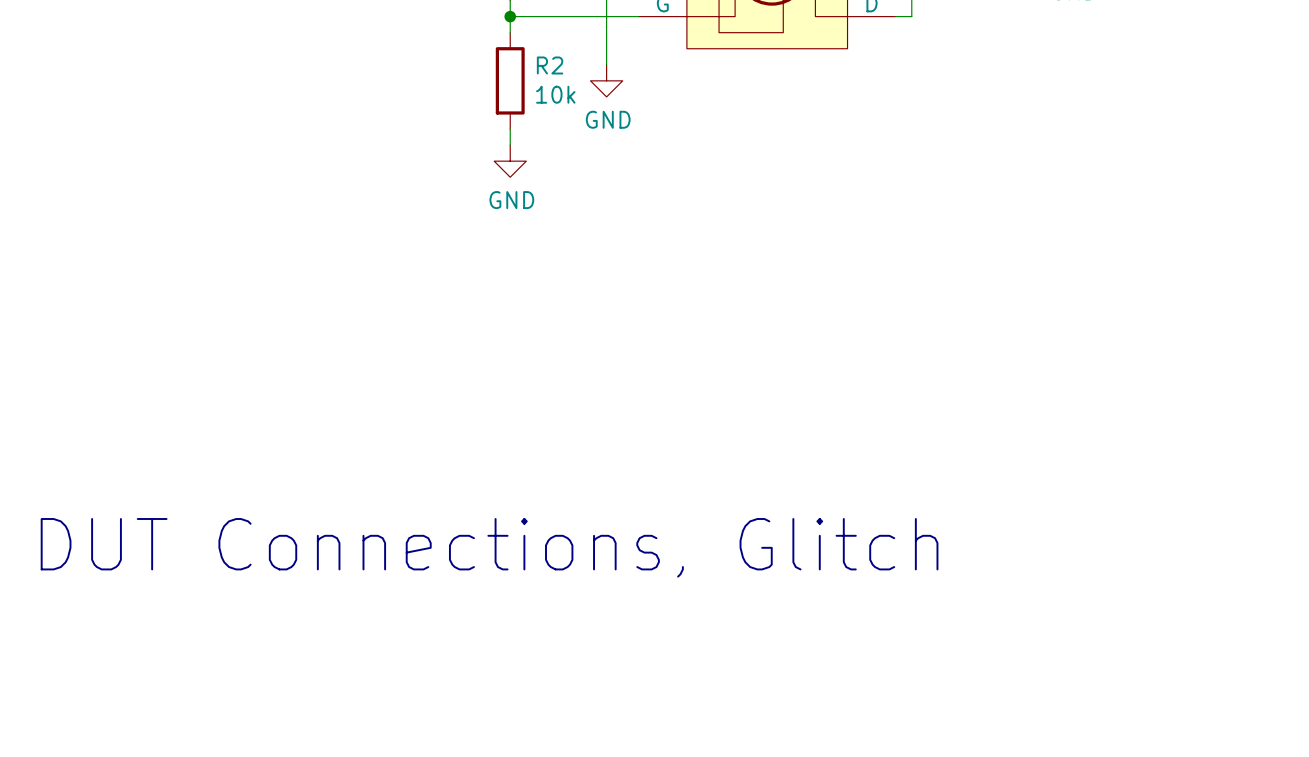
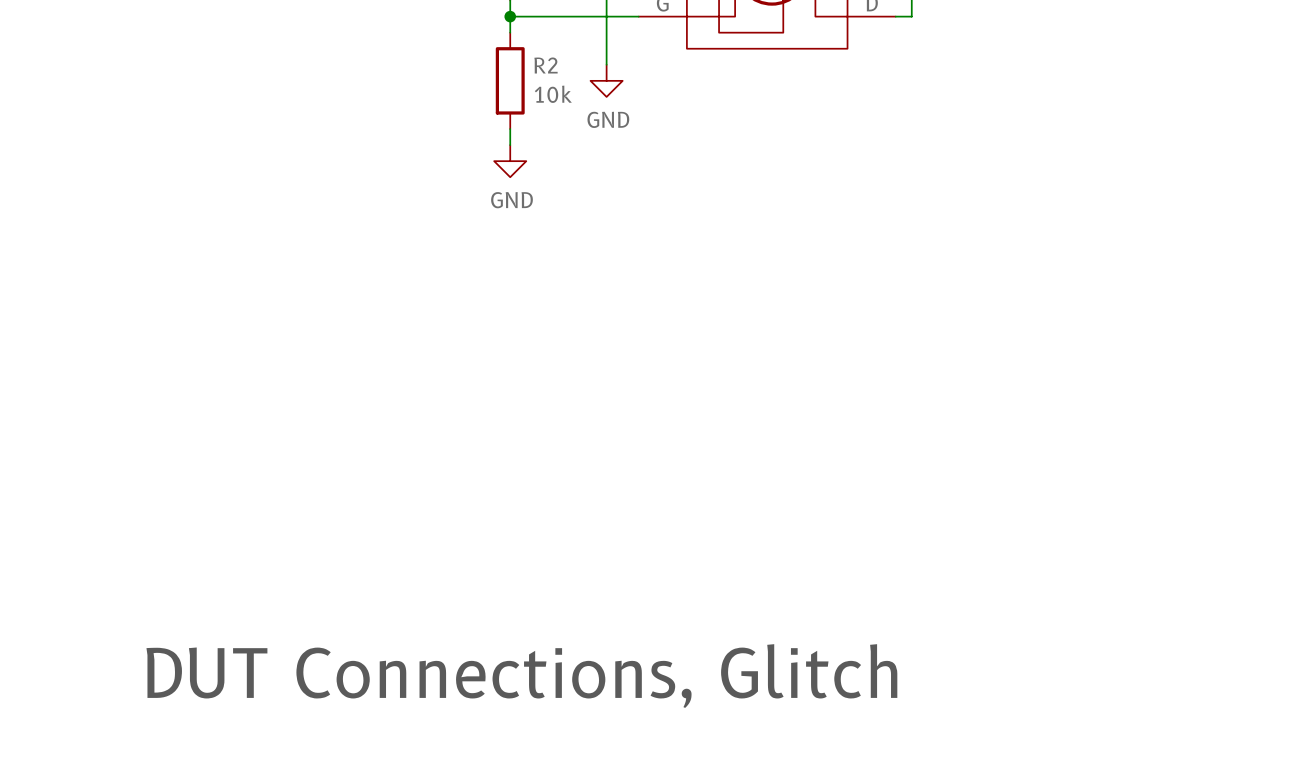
text position: DUT Connections, Glitch (489, 547) -> DUT Connections, Glitch (521, 676)

